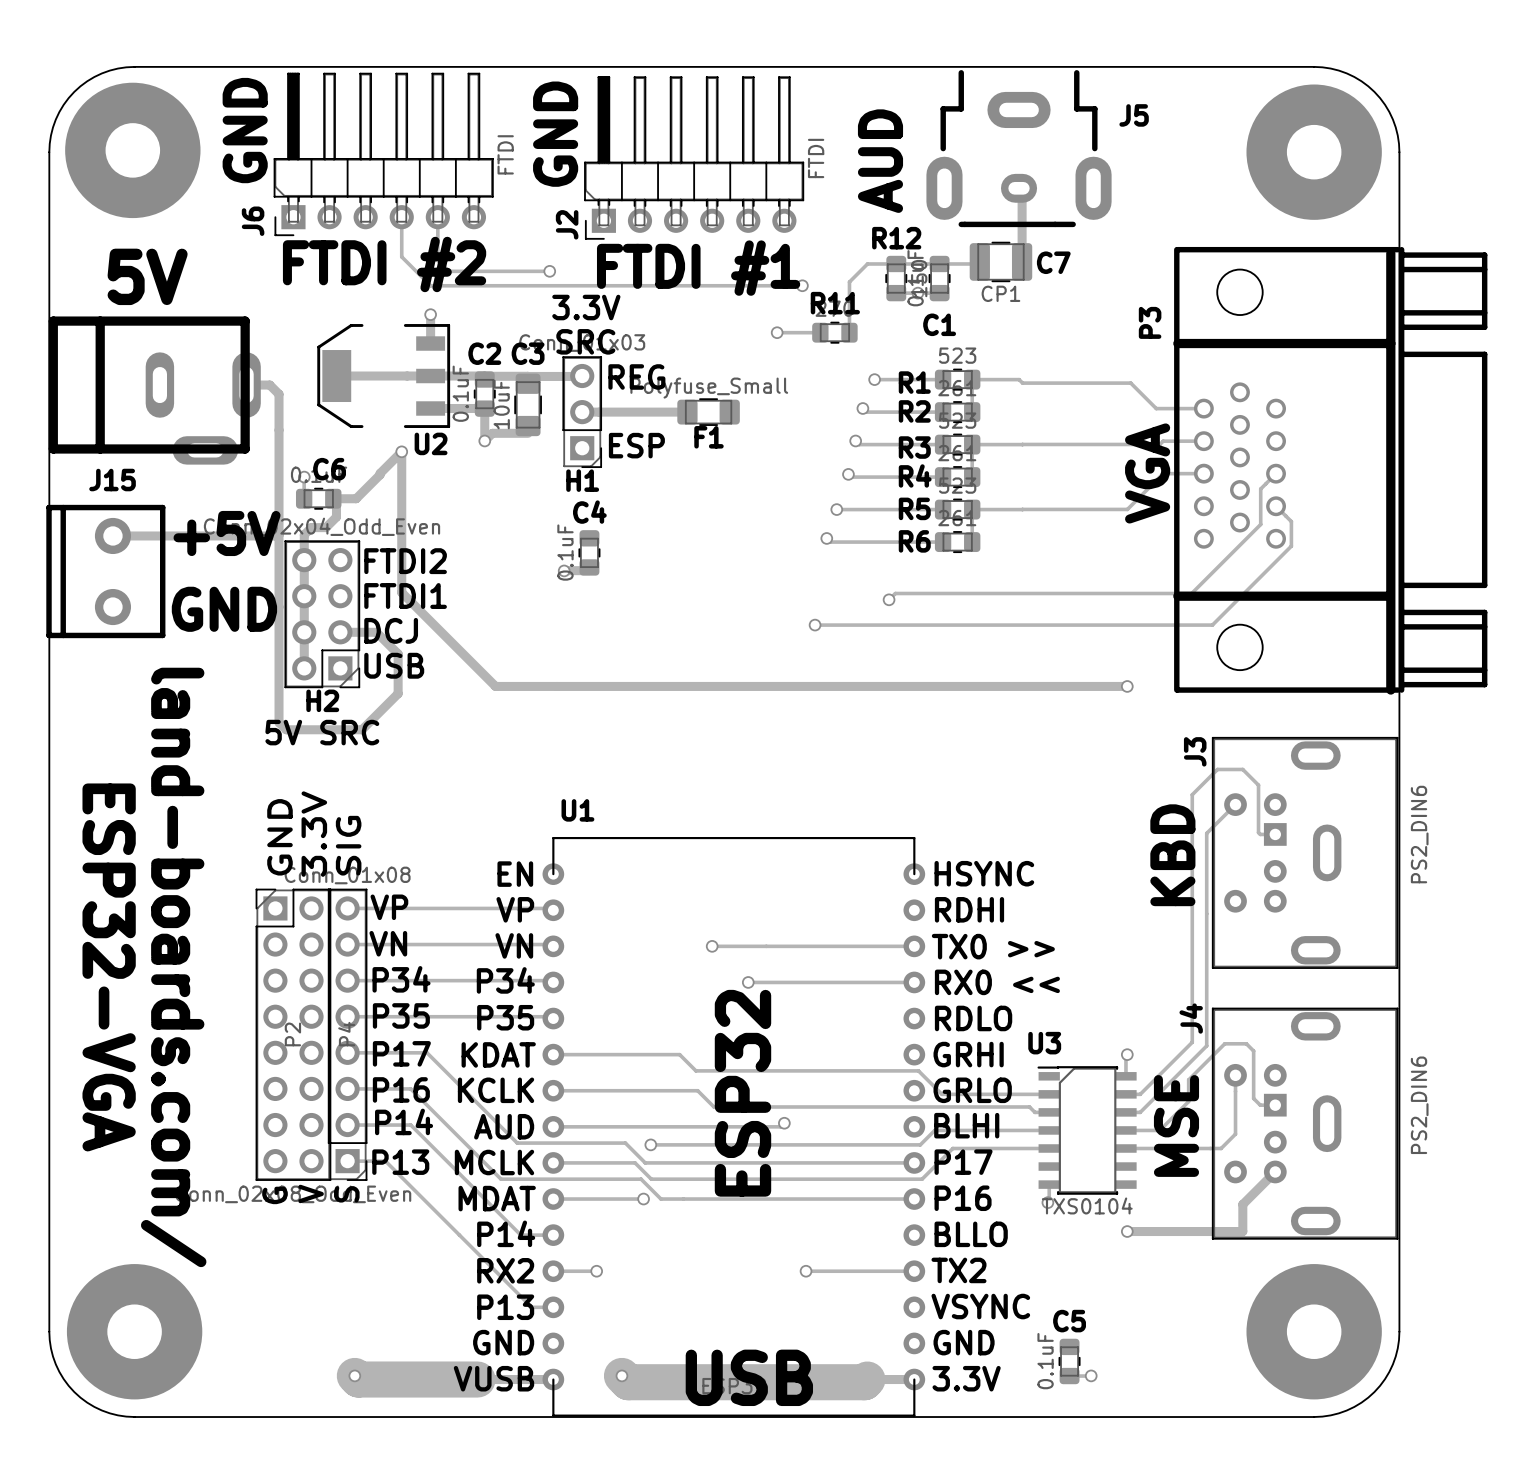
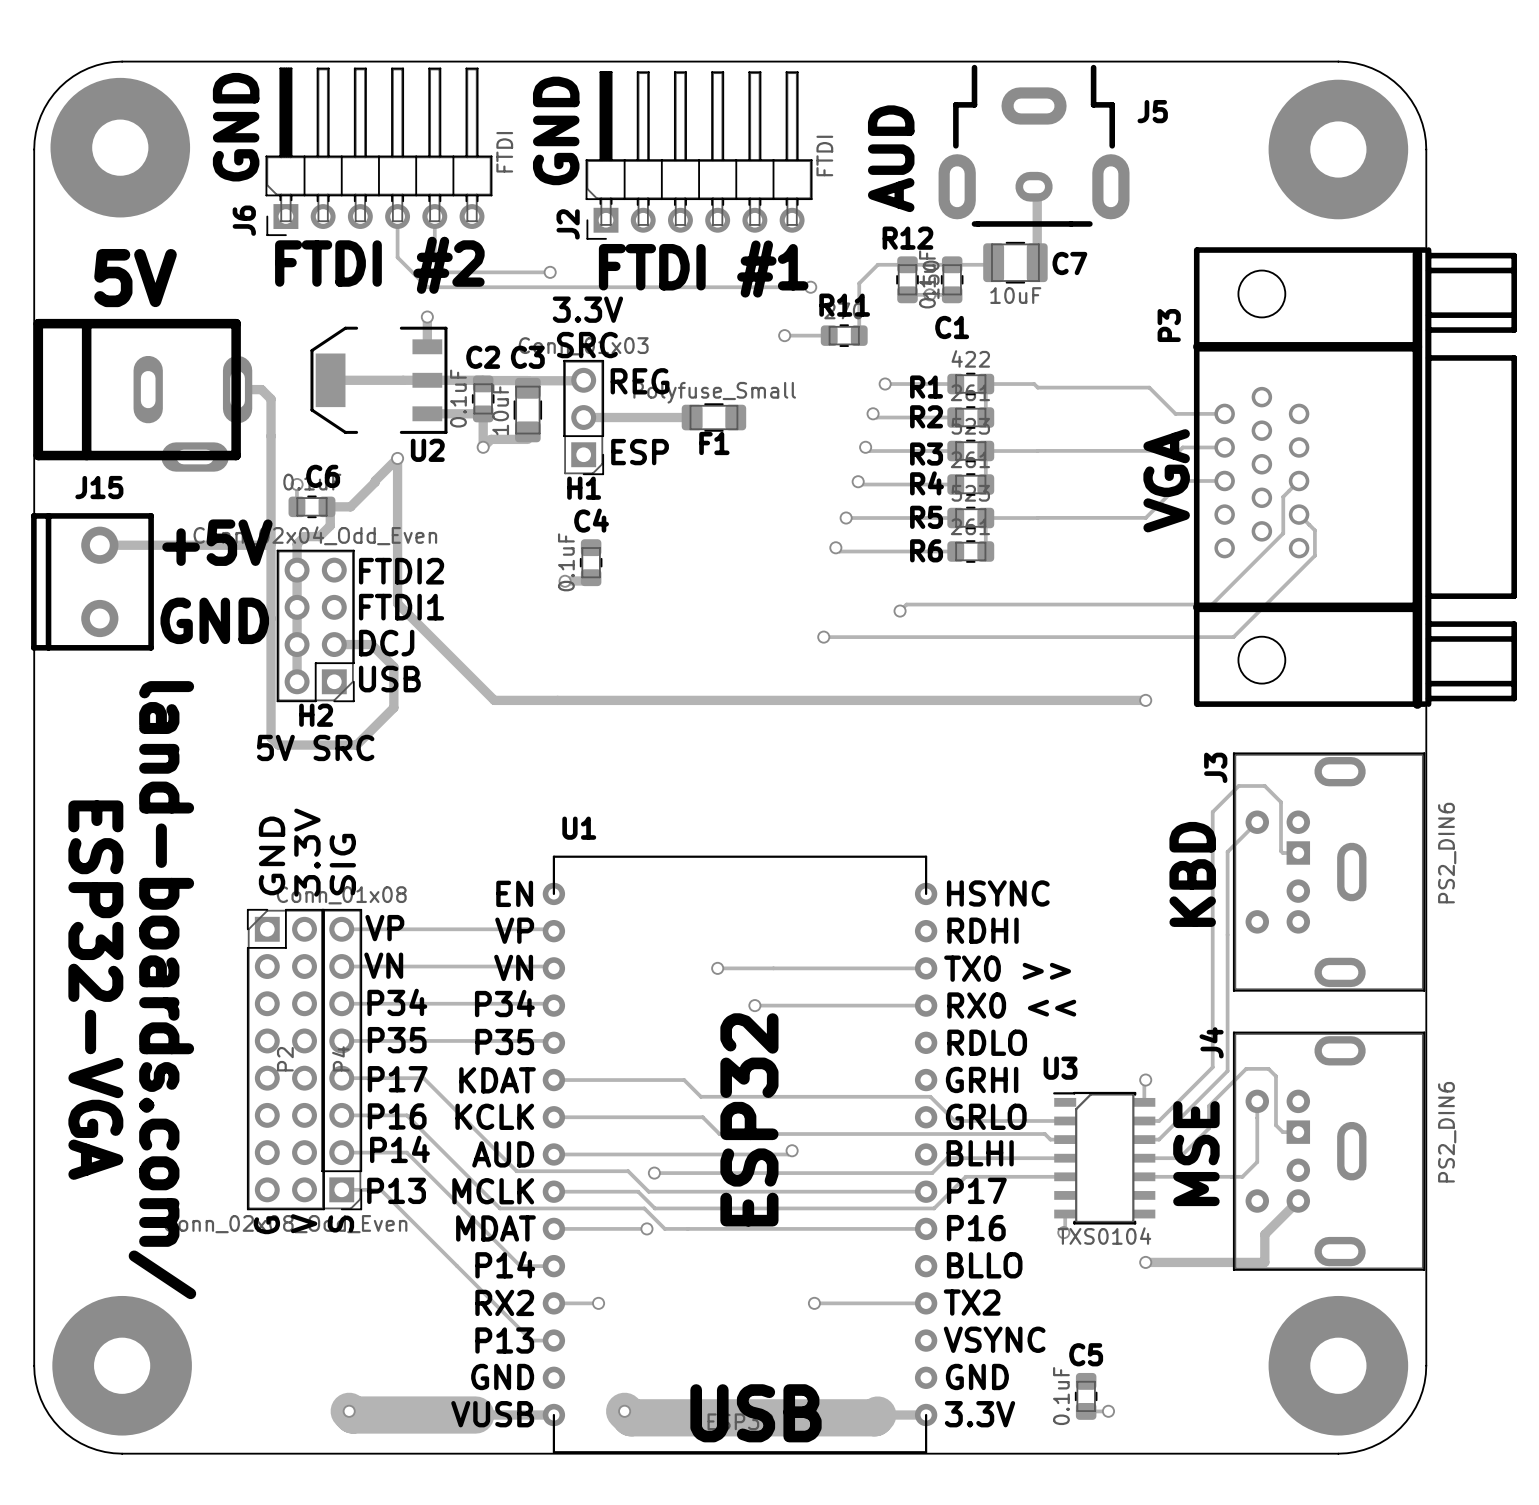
C7 value: CP1 (1000, 293) -> 10uF (1015, 295)
R1 value: 523 (957, 355) -> 422 (970, 358)

